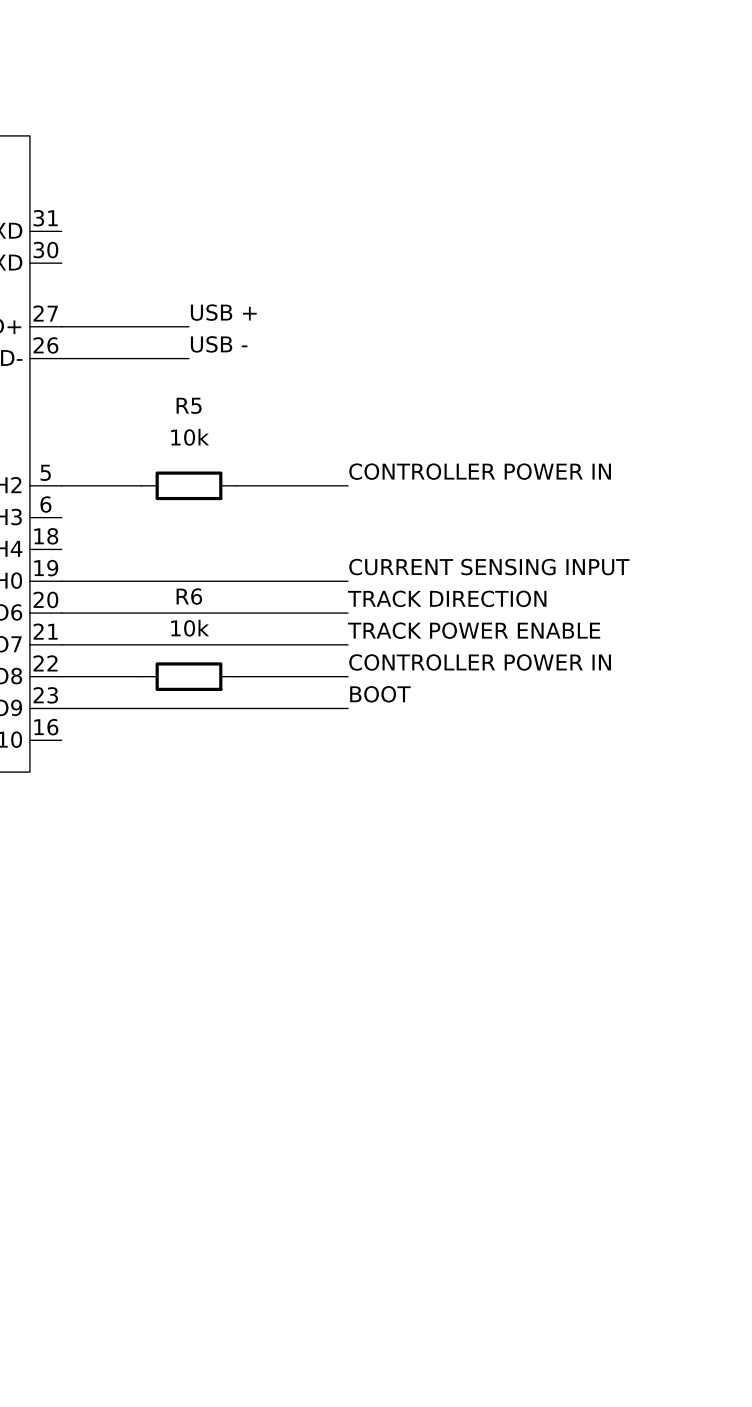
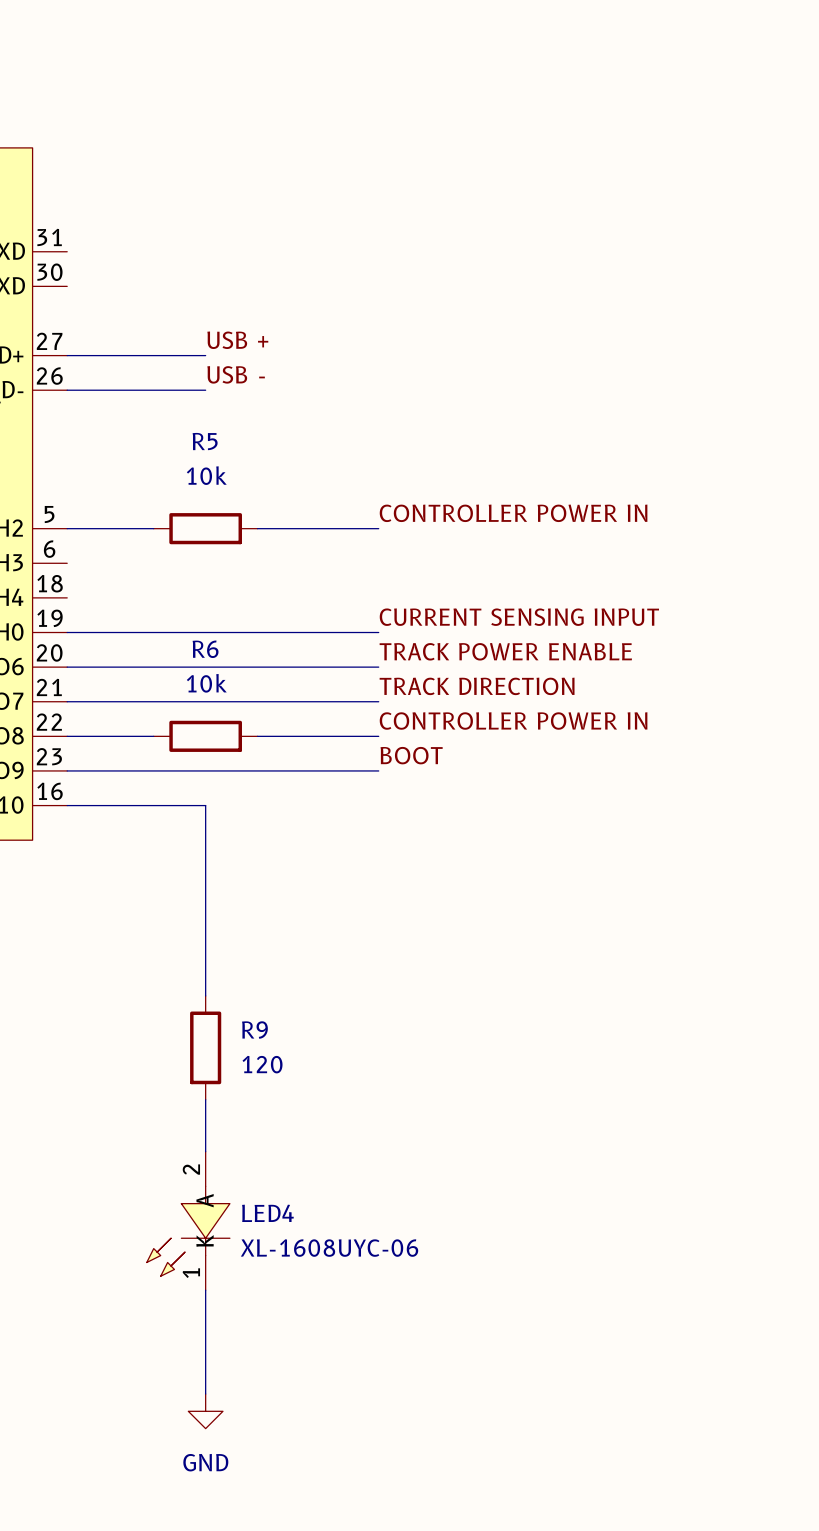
label: TRACK DIRECTION (447, 598) -> TRACK POWER ENABLE (505, 651)
label: TRACK POWER ENABLE (474, 630) -> TRACK DIRECTION (477, 686)
wire: none -> (67, 805) (205, 805) (205, 995)
R9: none -> 120 (205, 1047)
wire: none -> (205, 1099) (205, 1151)
LED4: none -> XL-1608UYC-06 (188, 1220)
wire: none -> (205, 1290) (205, 1394)
power symbol: none -> GND (205, 1411)

